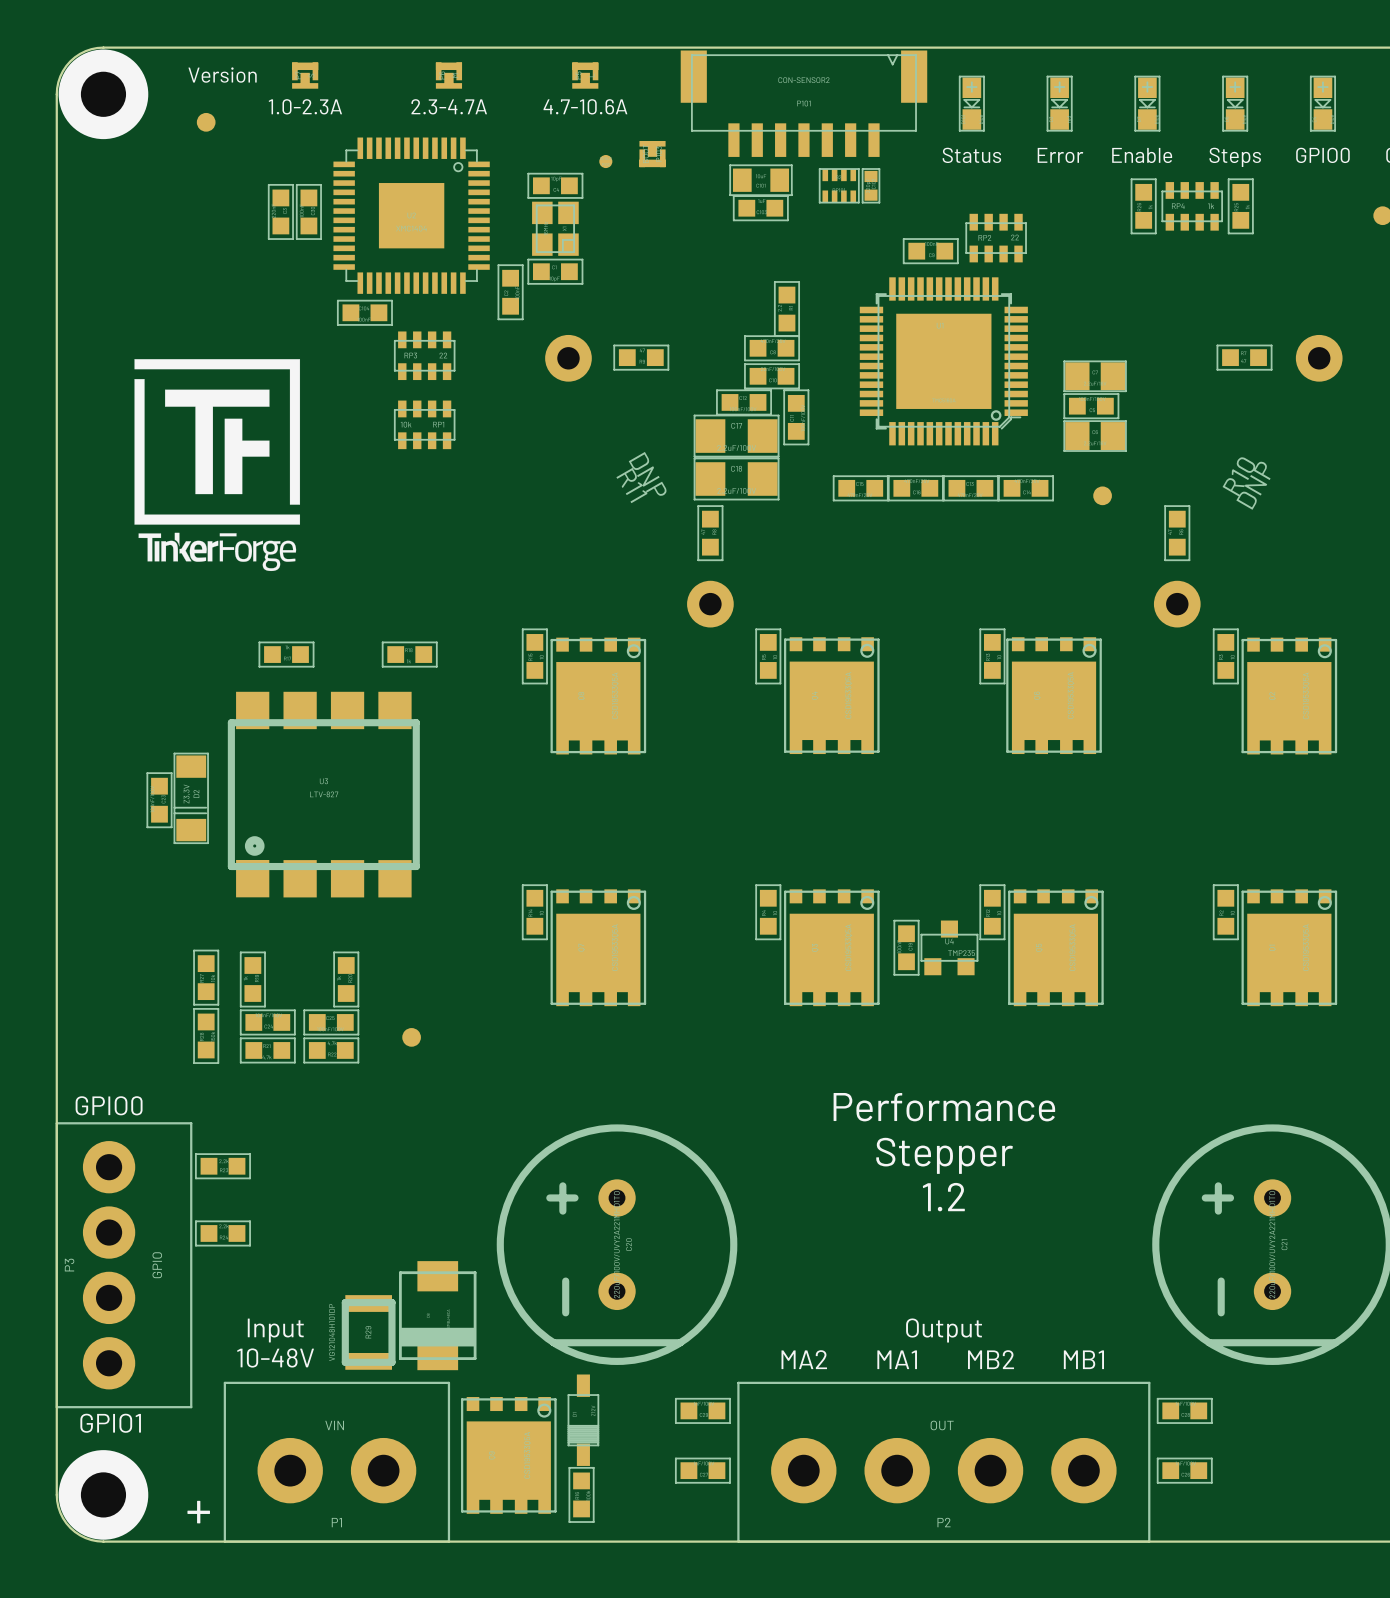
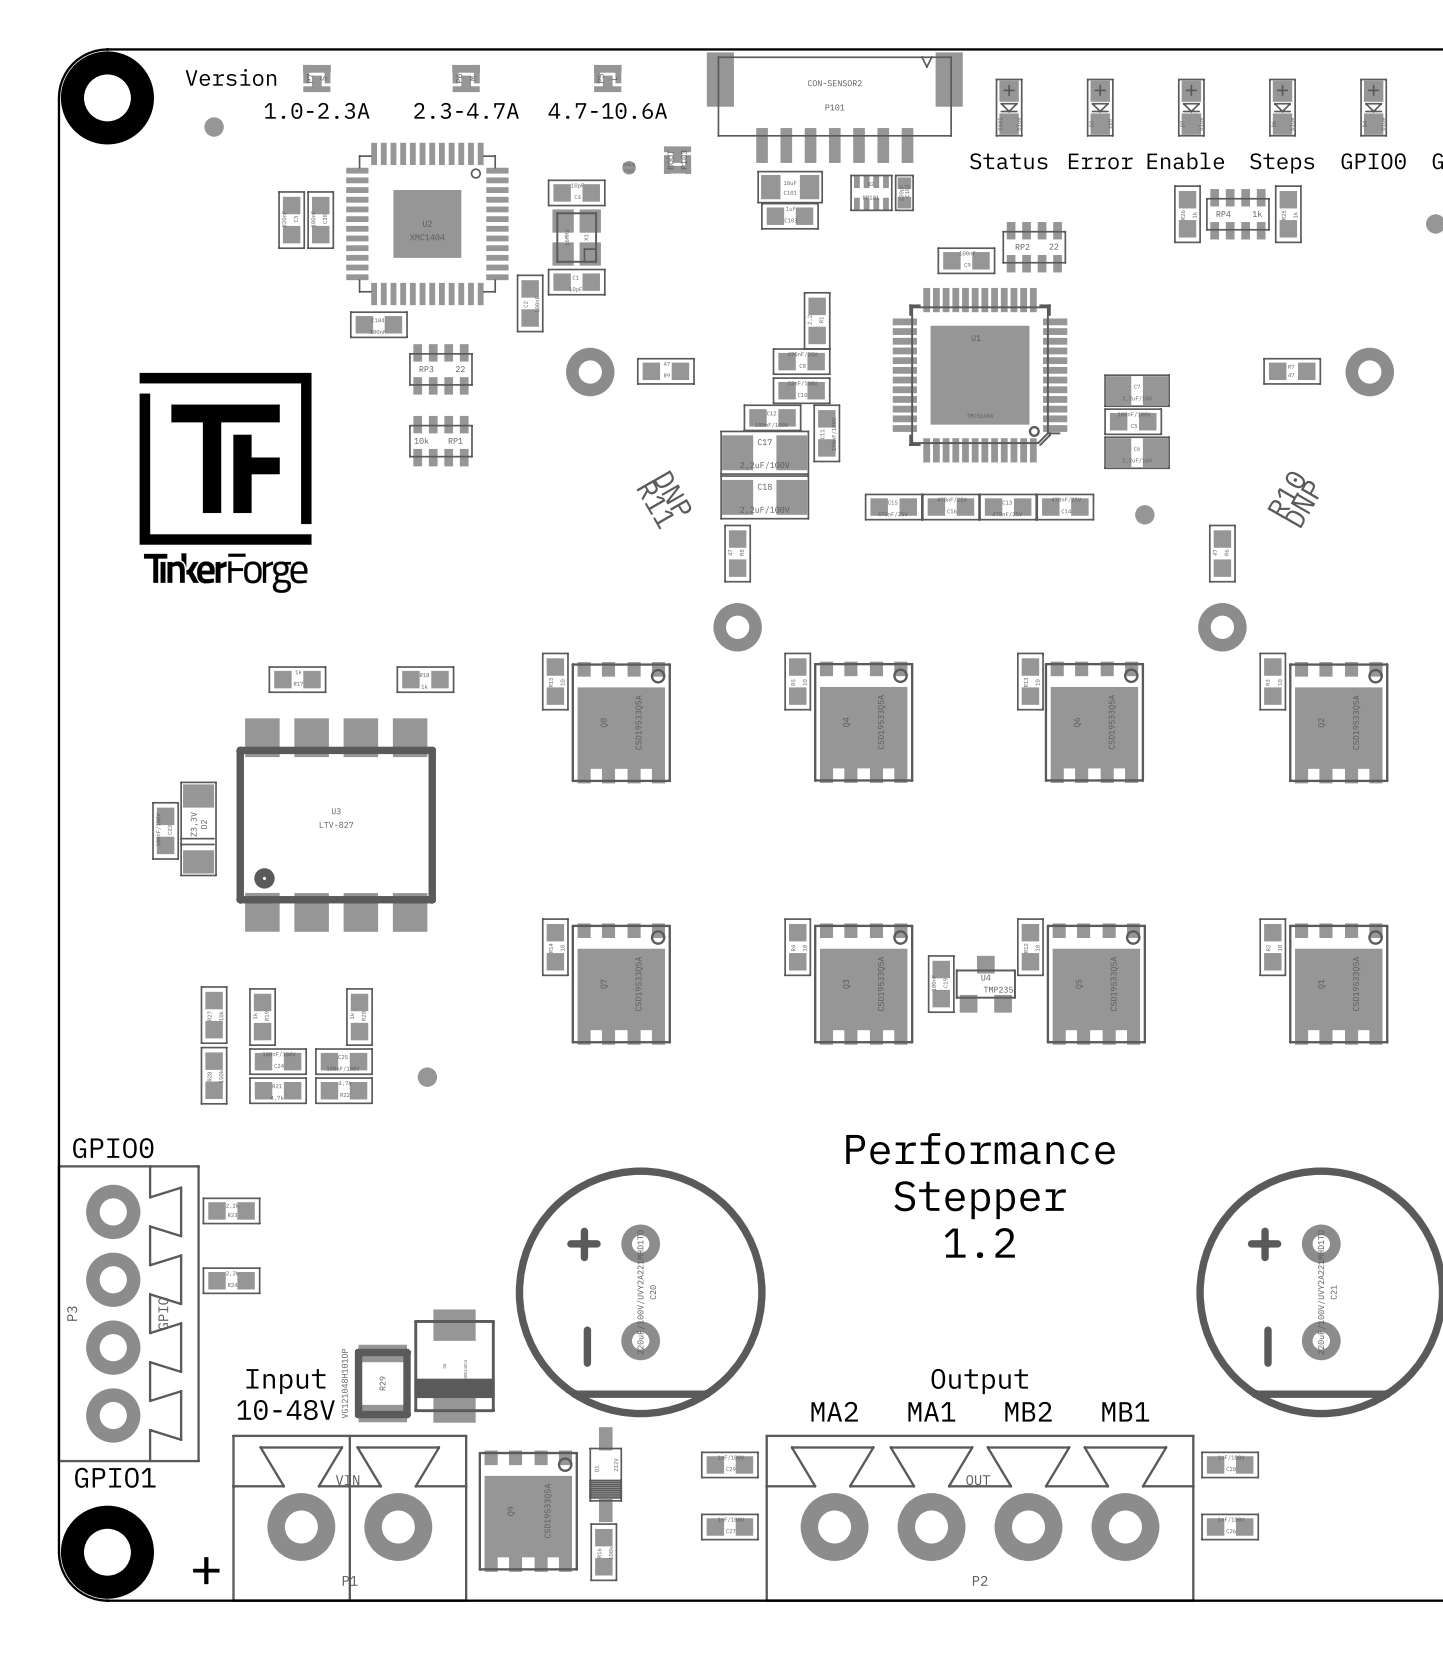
P3 footprint: [55, 1122, 193, 1409] -> [57, 1165, 200, 1463]
P1 footprint: [223, 1381, 451, 1543] -> [232, 1434, 468, 1602]
P2 footprint: [737, 1381, 1151, 1543] -> [765, 1434, 1195, 1602]

